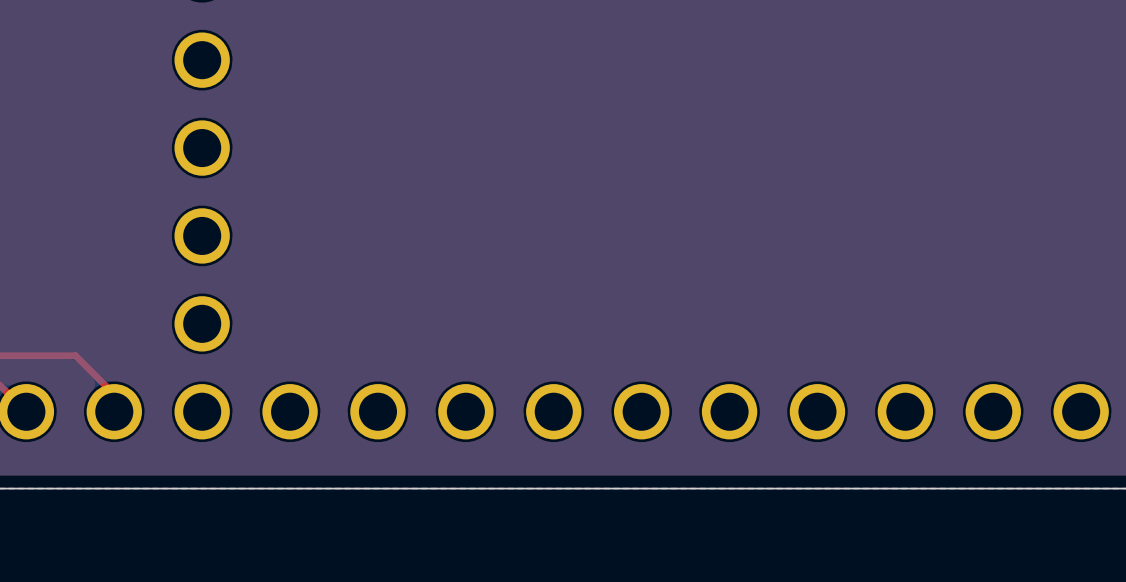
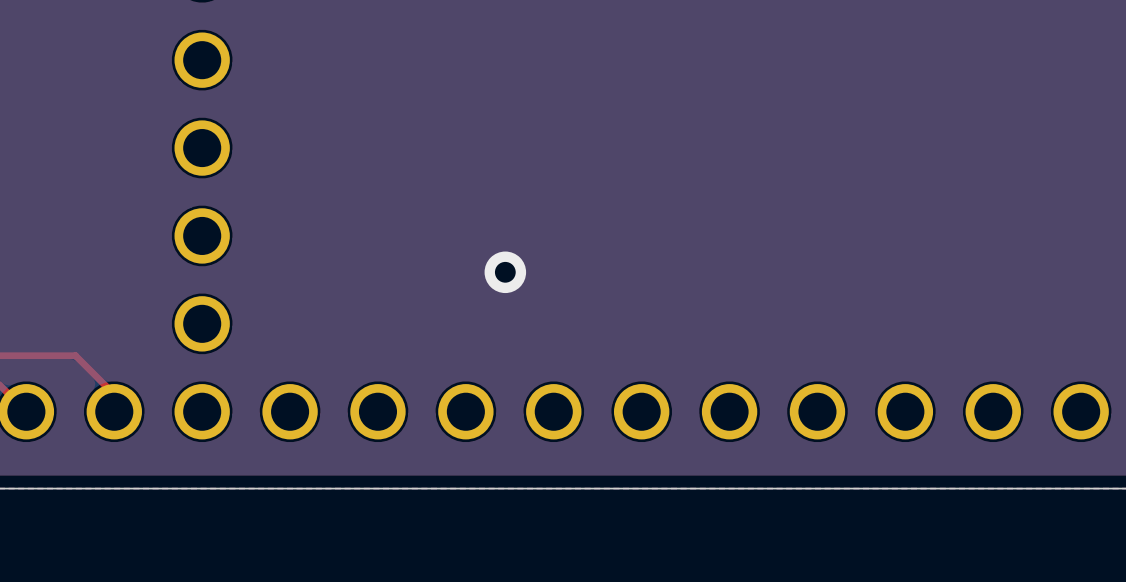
via: none -> (505, 272)

